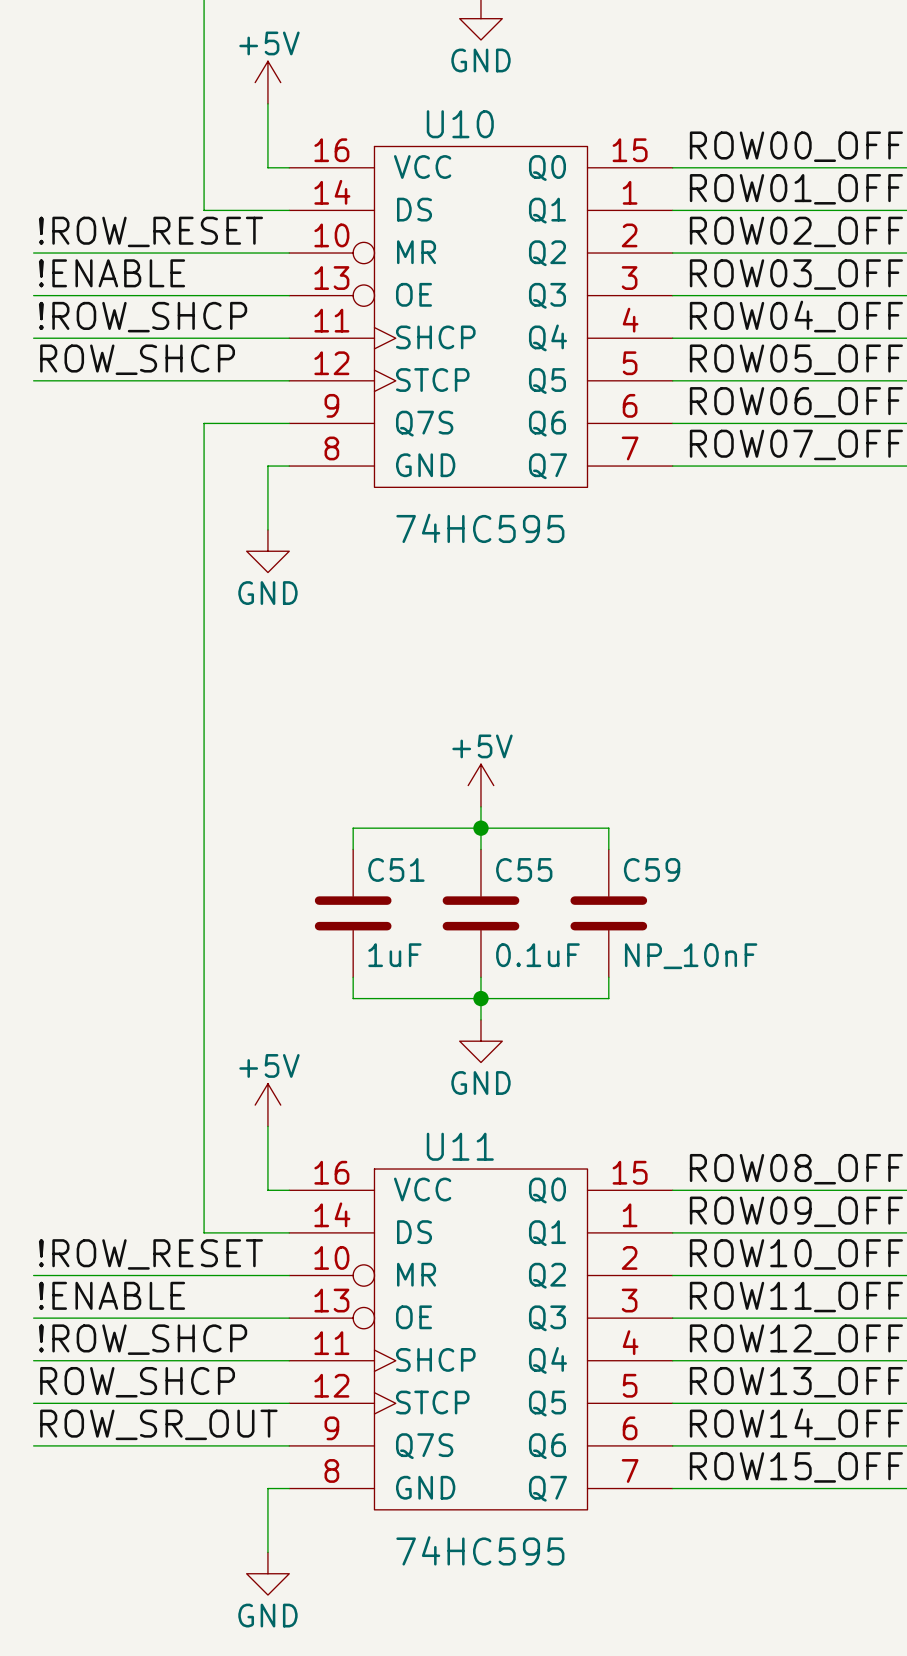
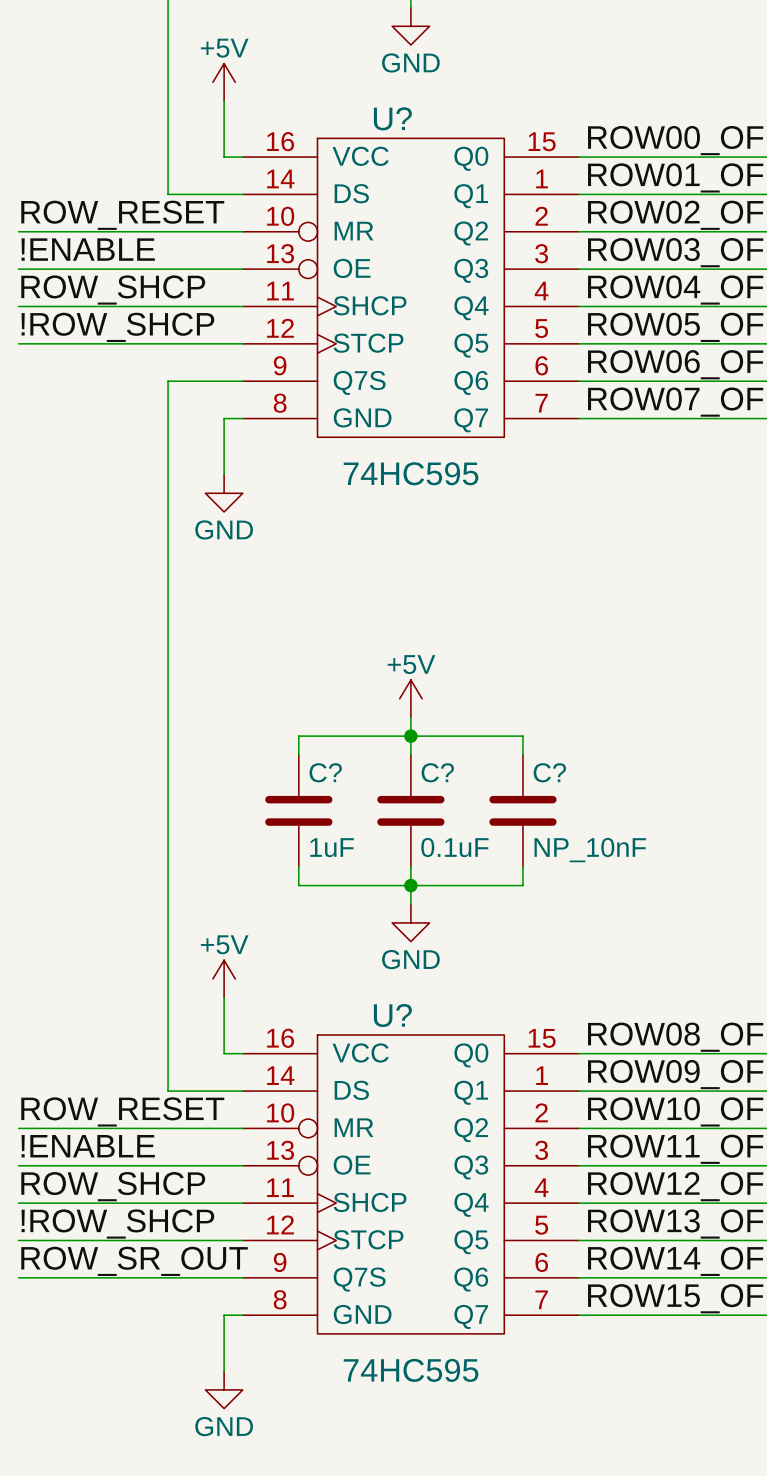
U10 name: U10 (460, 124) -> U? (392, 118)
label: !ROW_RESET (150, 231) -> ROW_RESET (122, 215)
label: !ROW_SHCP (143, 317) -> ROW_SHCP (113, 290)
label: ROW_SHCP (137, 359) -> !ROW_SHCP (117, 327)
C51 name: C51 (396, 869) -> C? (325, 772)
C55 name: C55 (524, 869) -> C? (437, 772)
C59 name: C59 (652, 869) -> C? (549, 772)
U11 name: U11 (460, 1146) -> U? (392, 1015)
label: !ROW_RESET (150, 1254) -> ROW_RESET (122, 1111)
label: !ROW_SHCP (143, 1339) -> ROW_SHCP (113, 1186)
label: ROW_SHCP (137, 1382) -> !ROW_SHCP (117, 1224)

